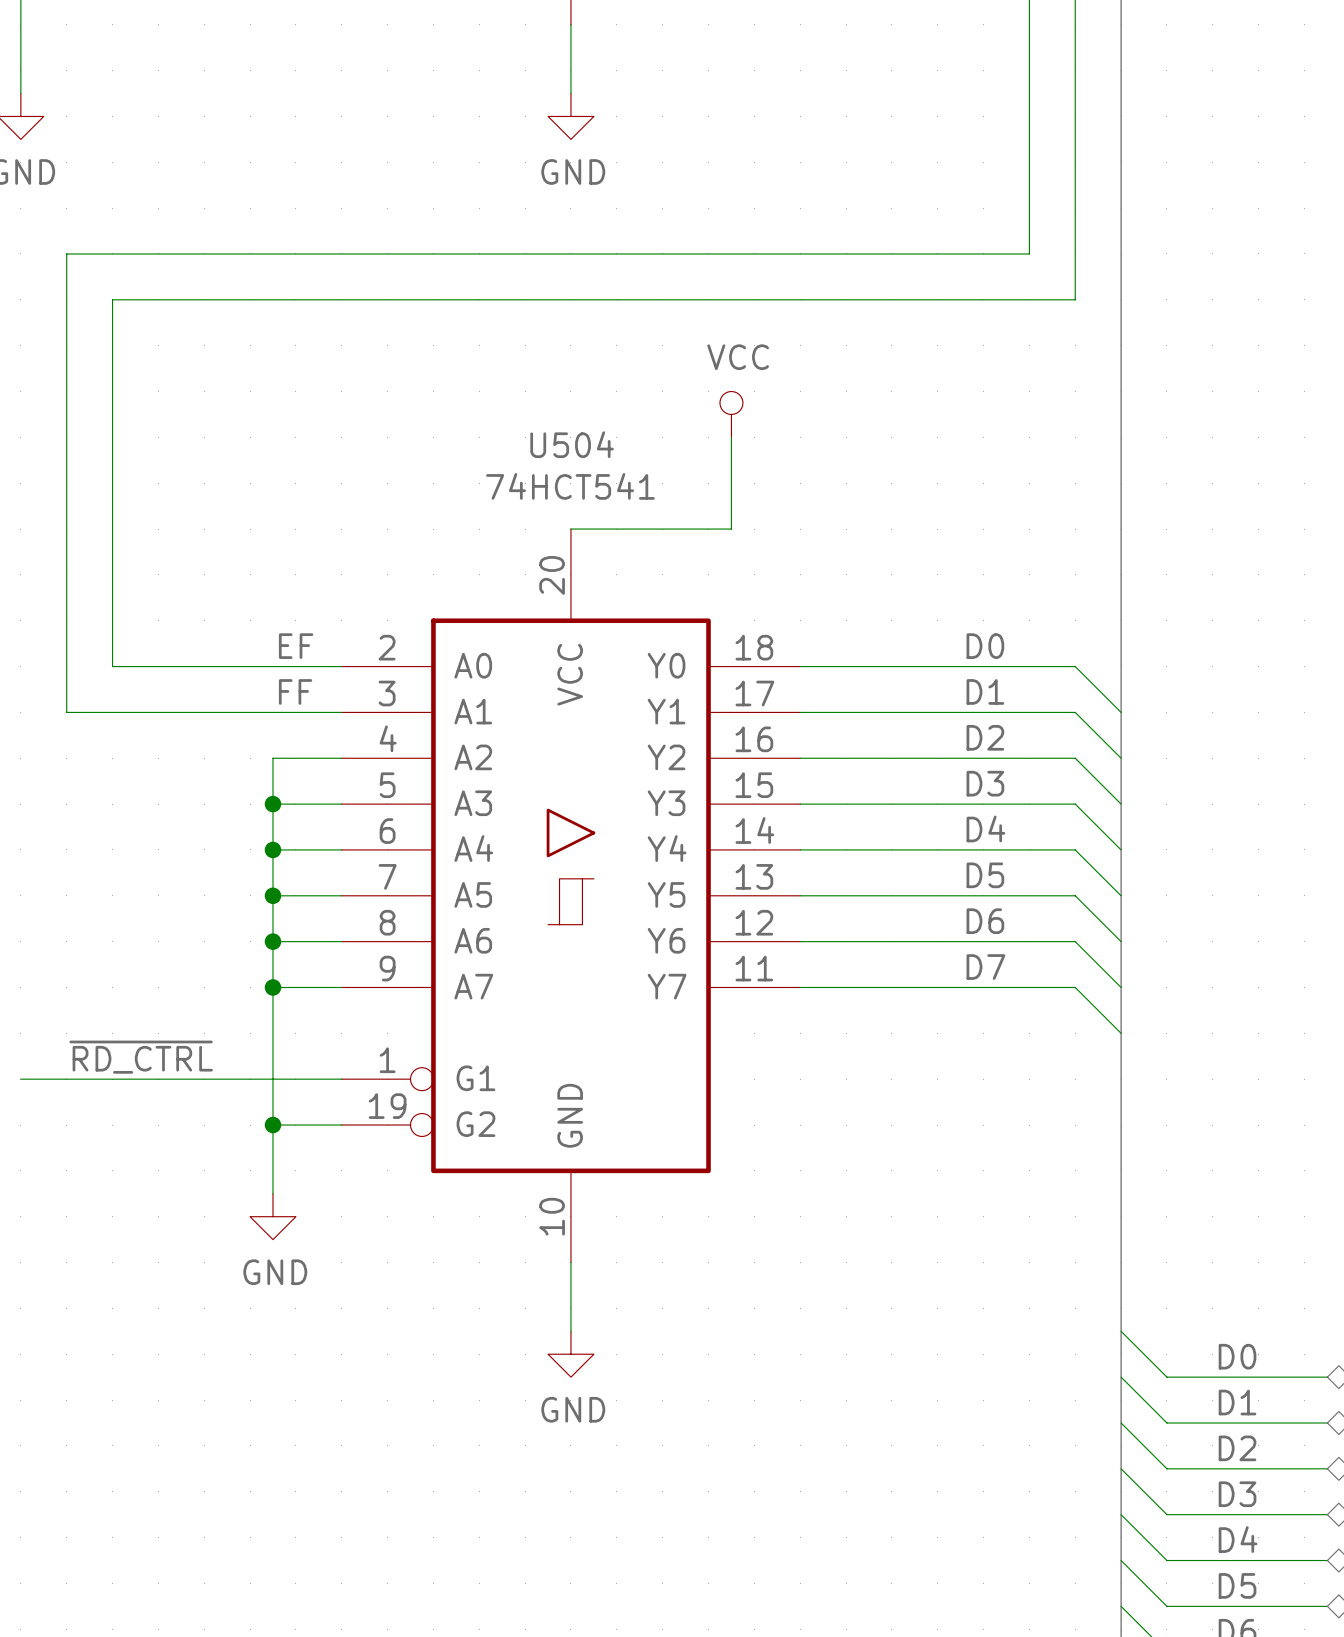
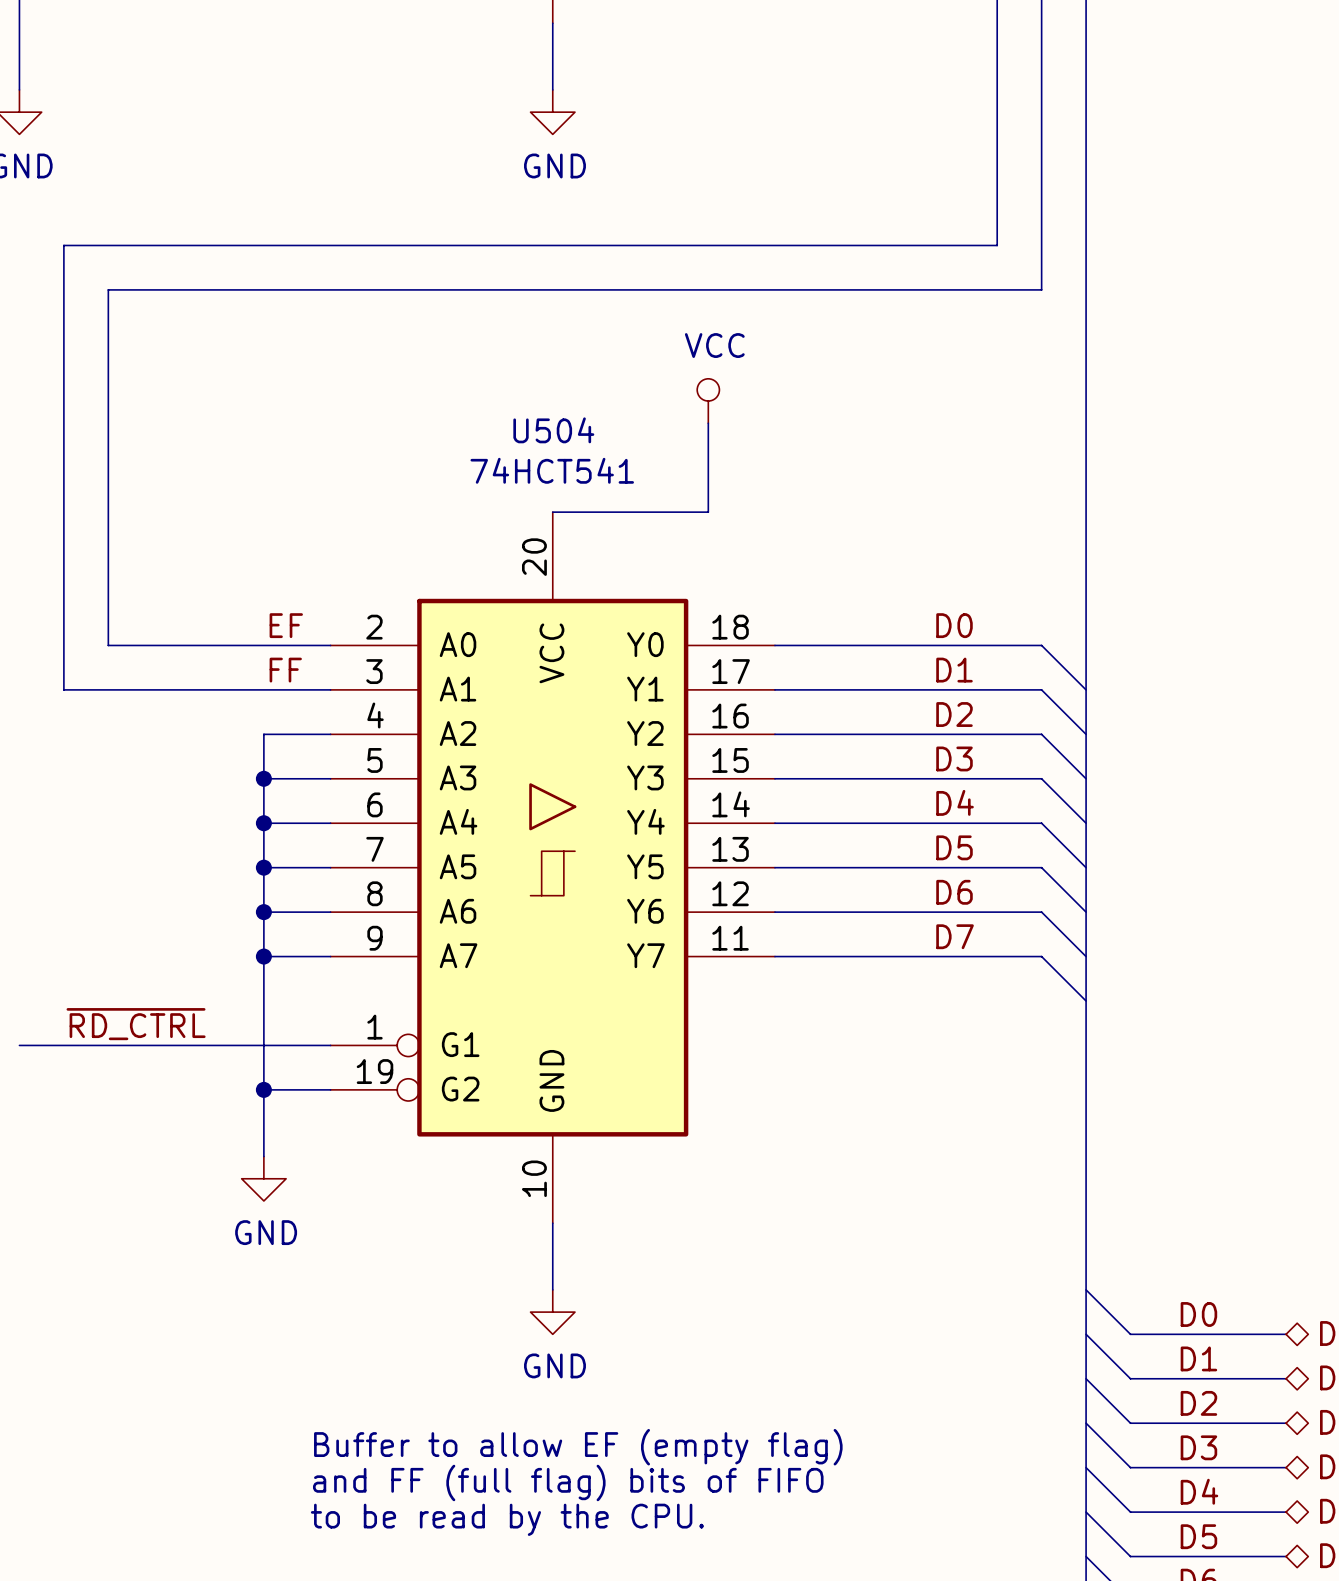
text: none -> Buffer to allow EF (empty flag) (578, 1447)
text: none -> and FF (full flag) bits of FIFO (568, 1482)
text: none -> to be read by the CPU. (507, 1519)

